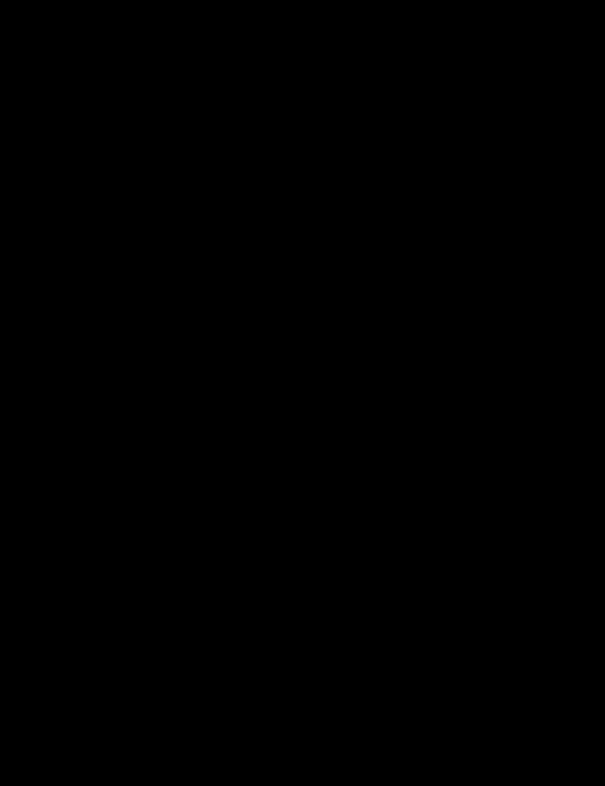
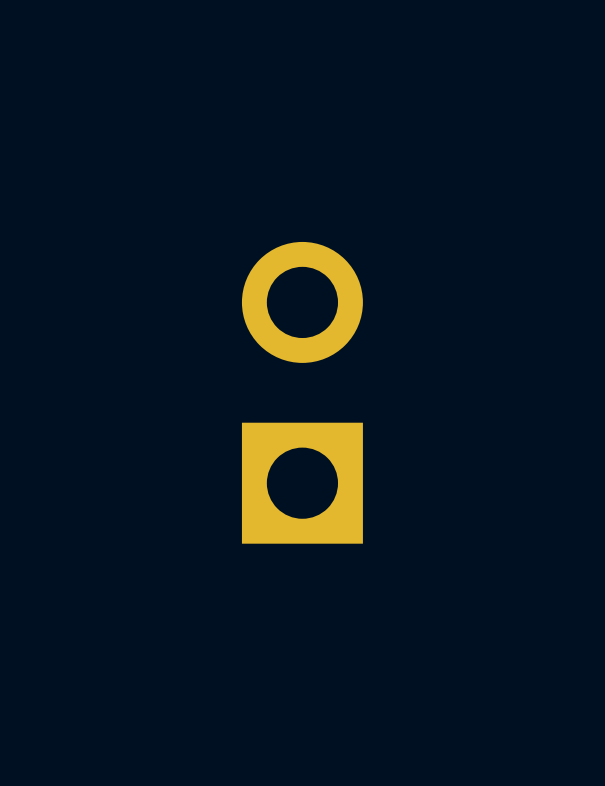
part: none -> (302, 392)

